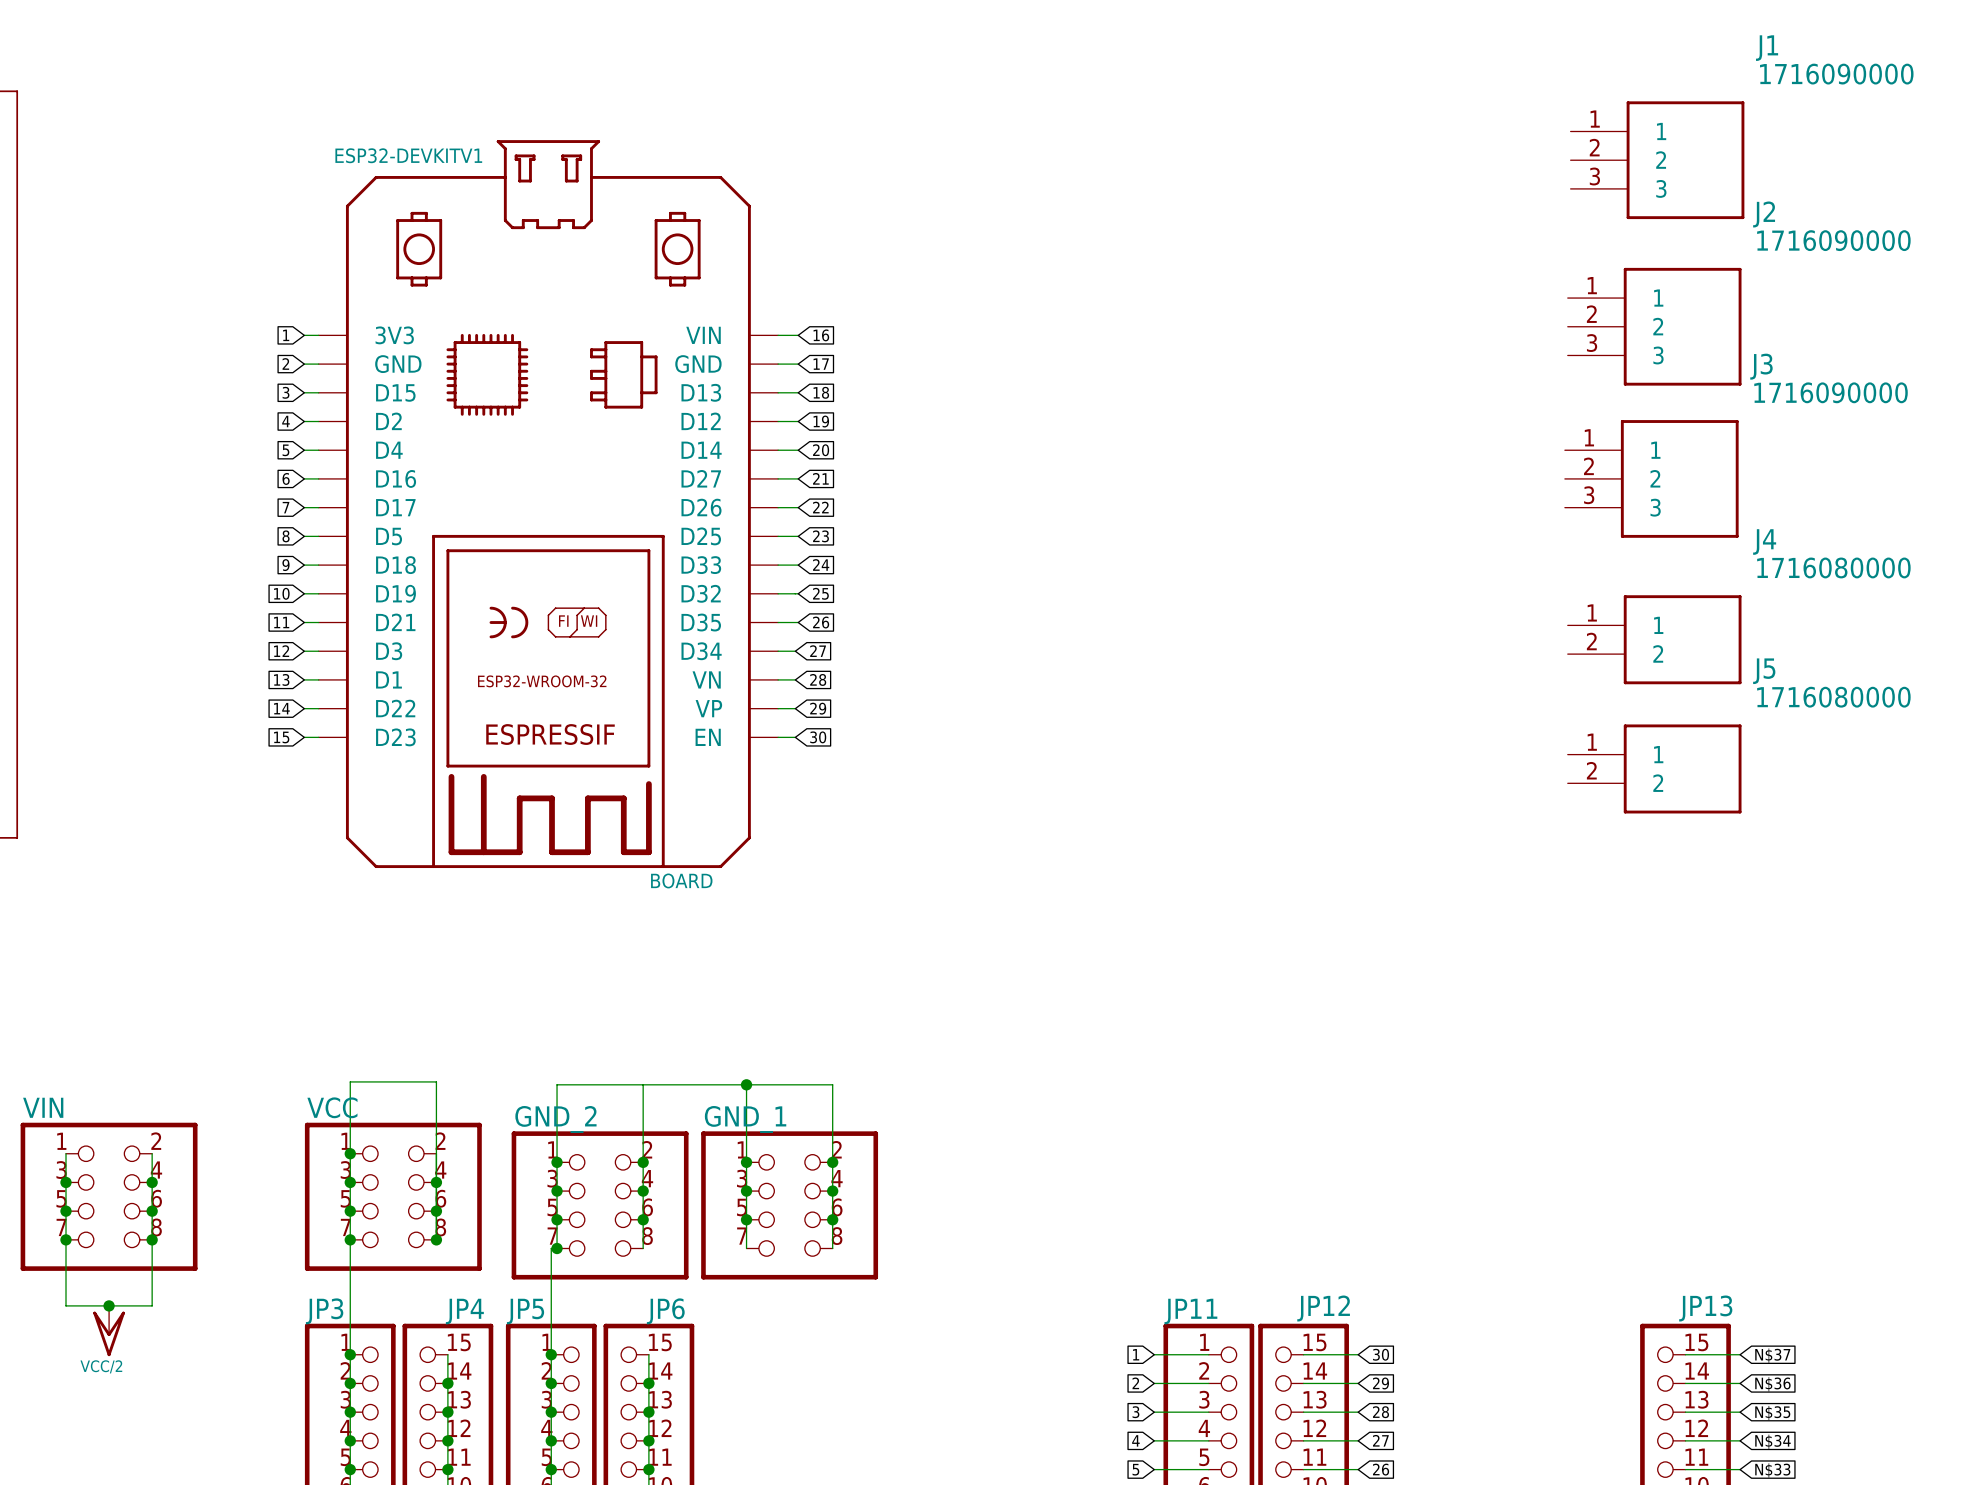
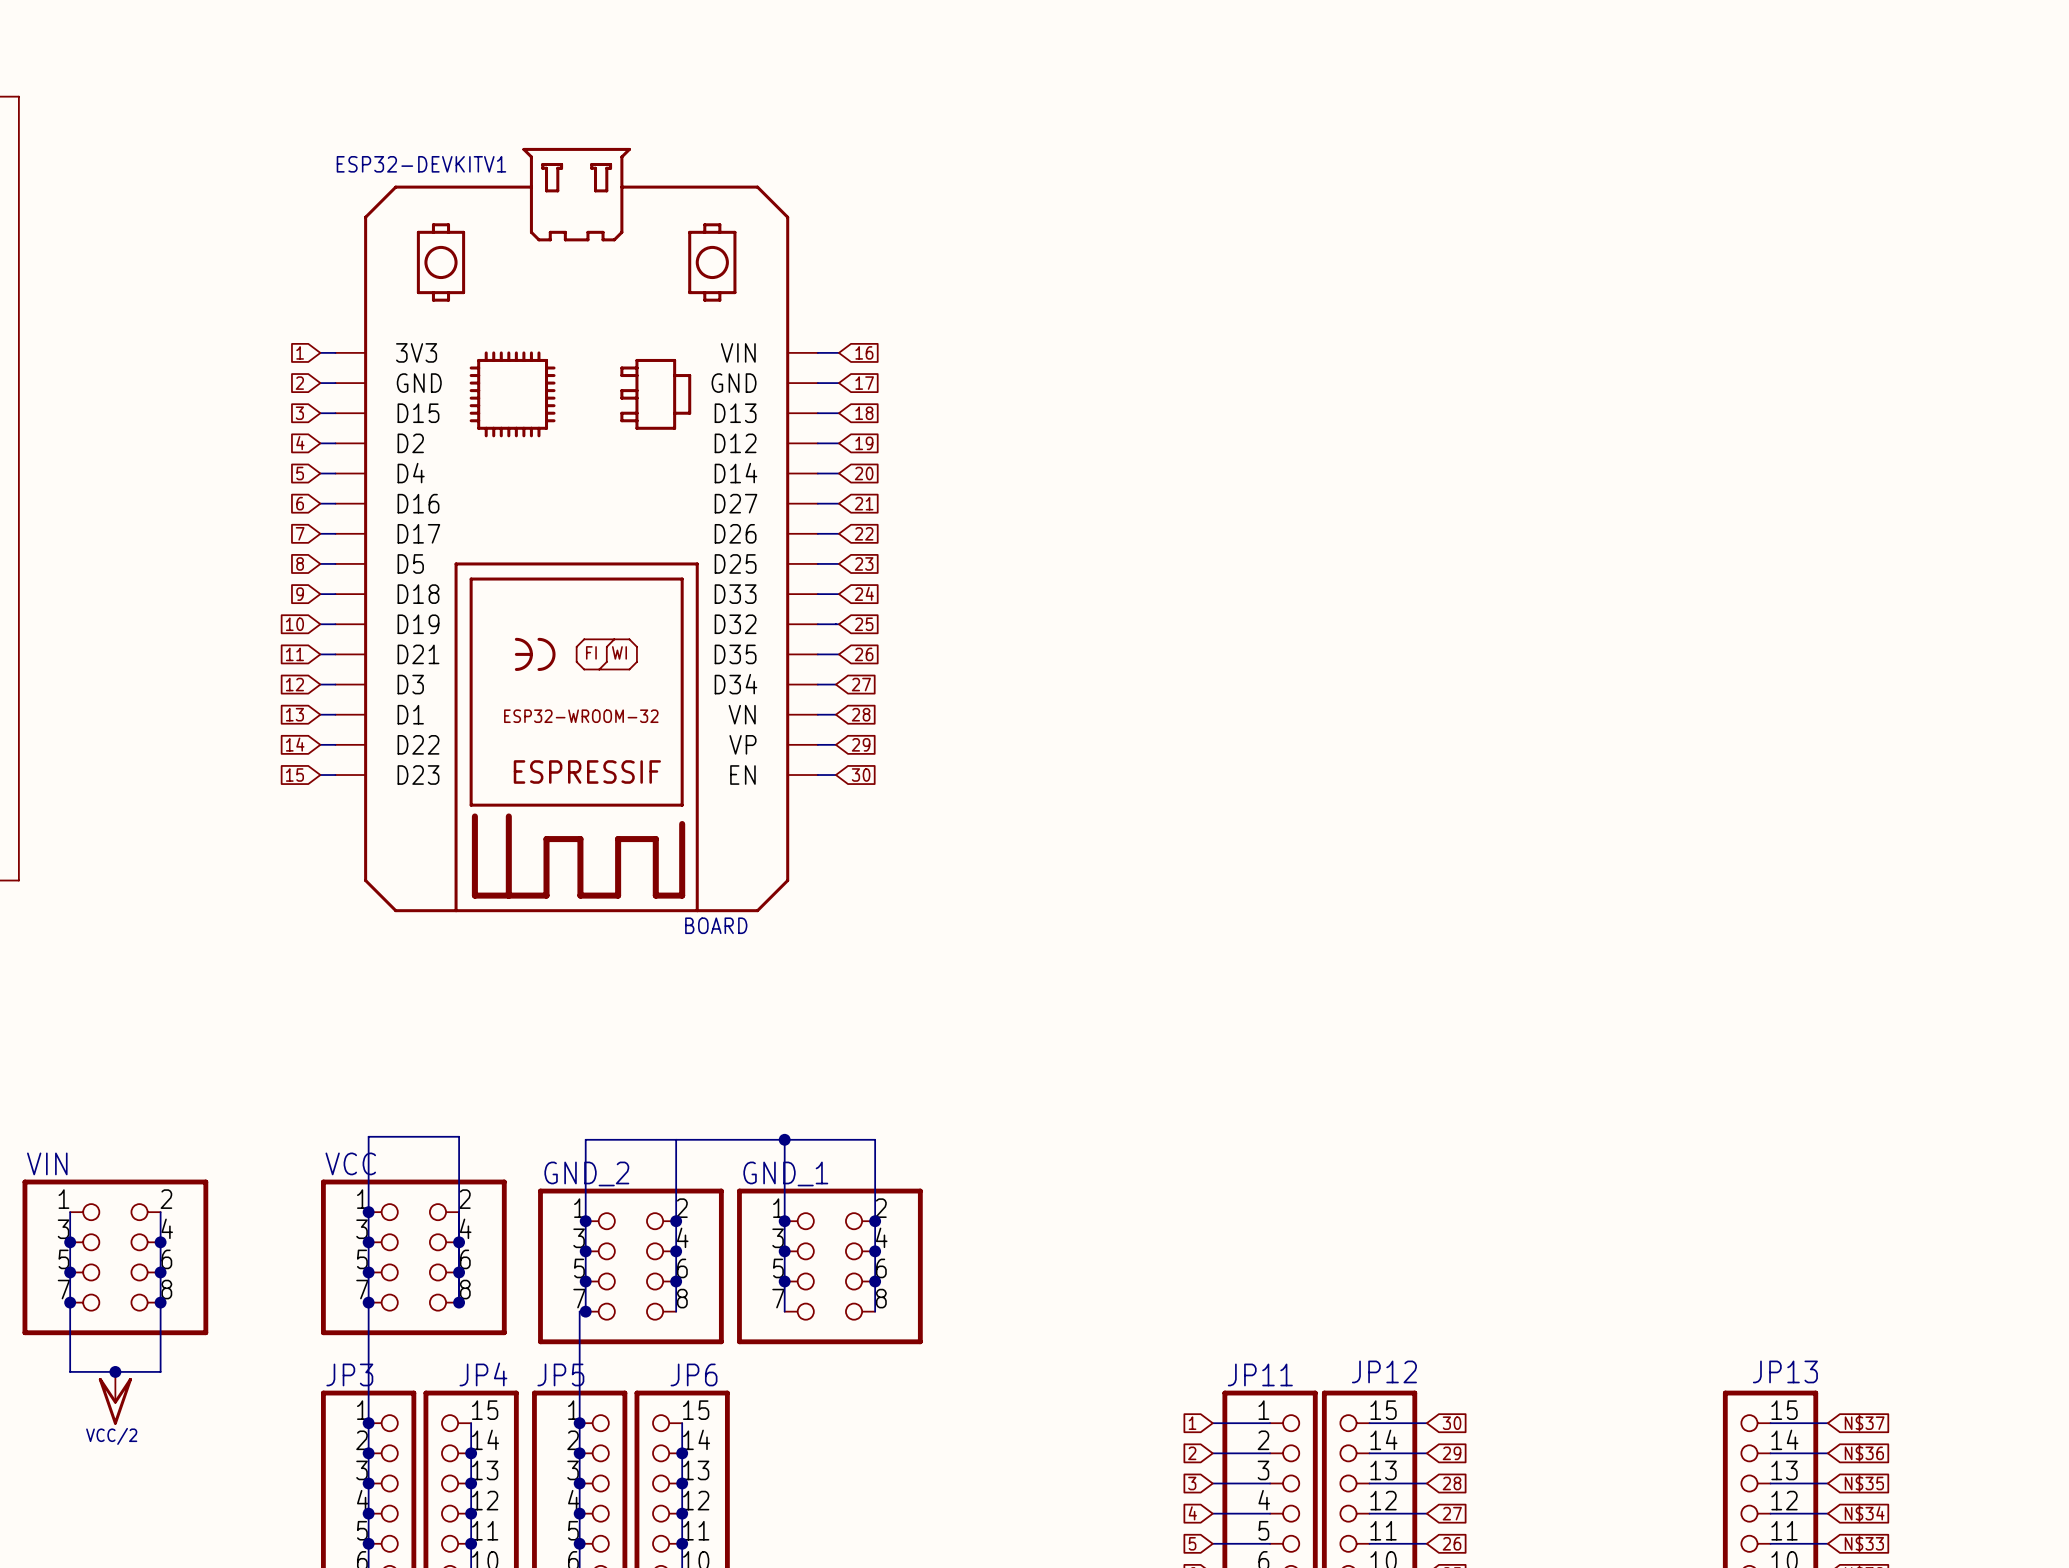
J1: 1716090000 (1657, 160) -> none
J2: 1716090000 (1654, 326) -> none
J3: 1716090000 (1651, 478) -> none
J4: 1716080000 (1654, 639) -> none
J5: 1716080000 (1654, 768) -> none

